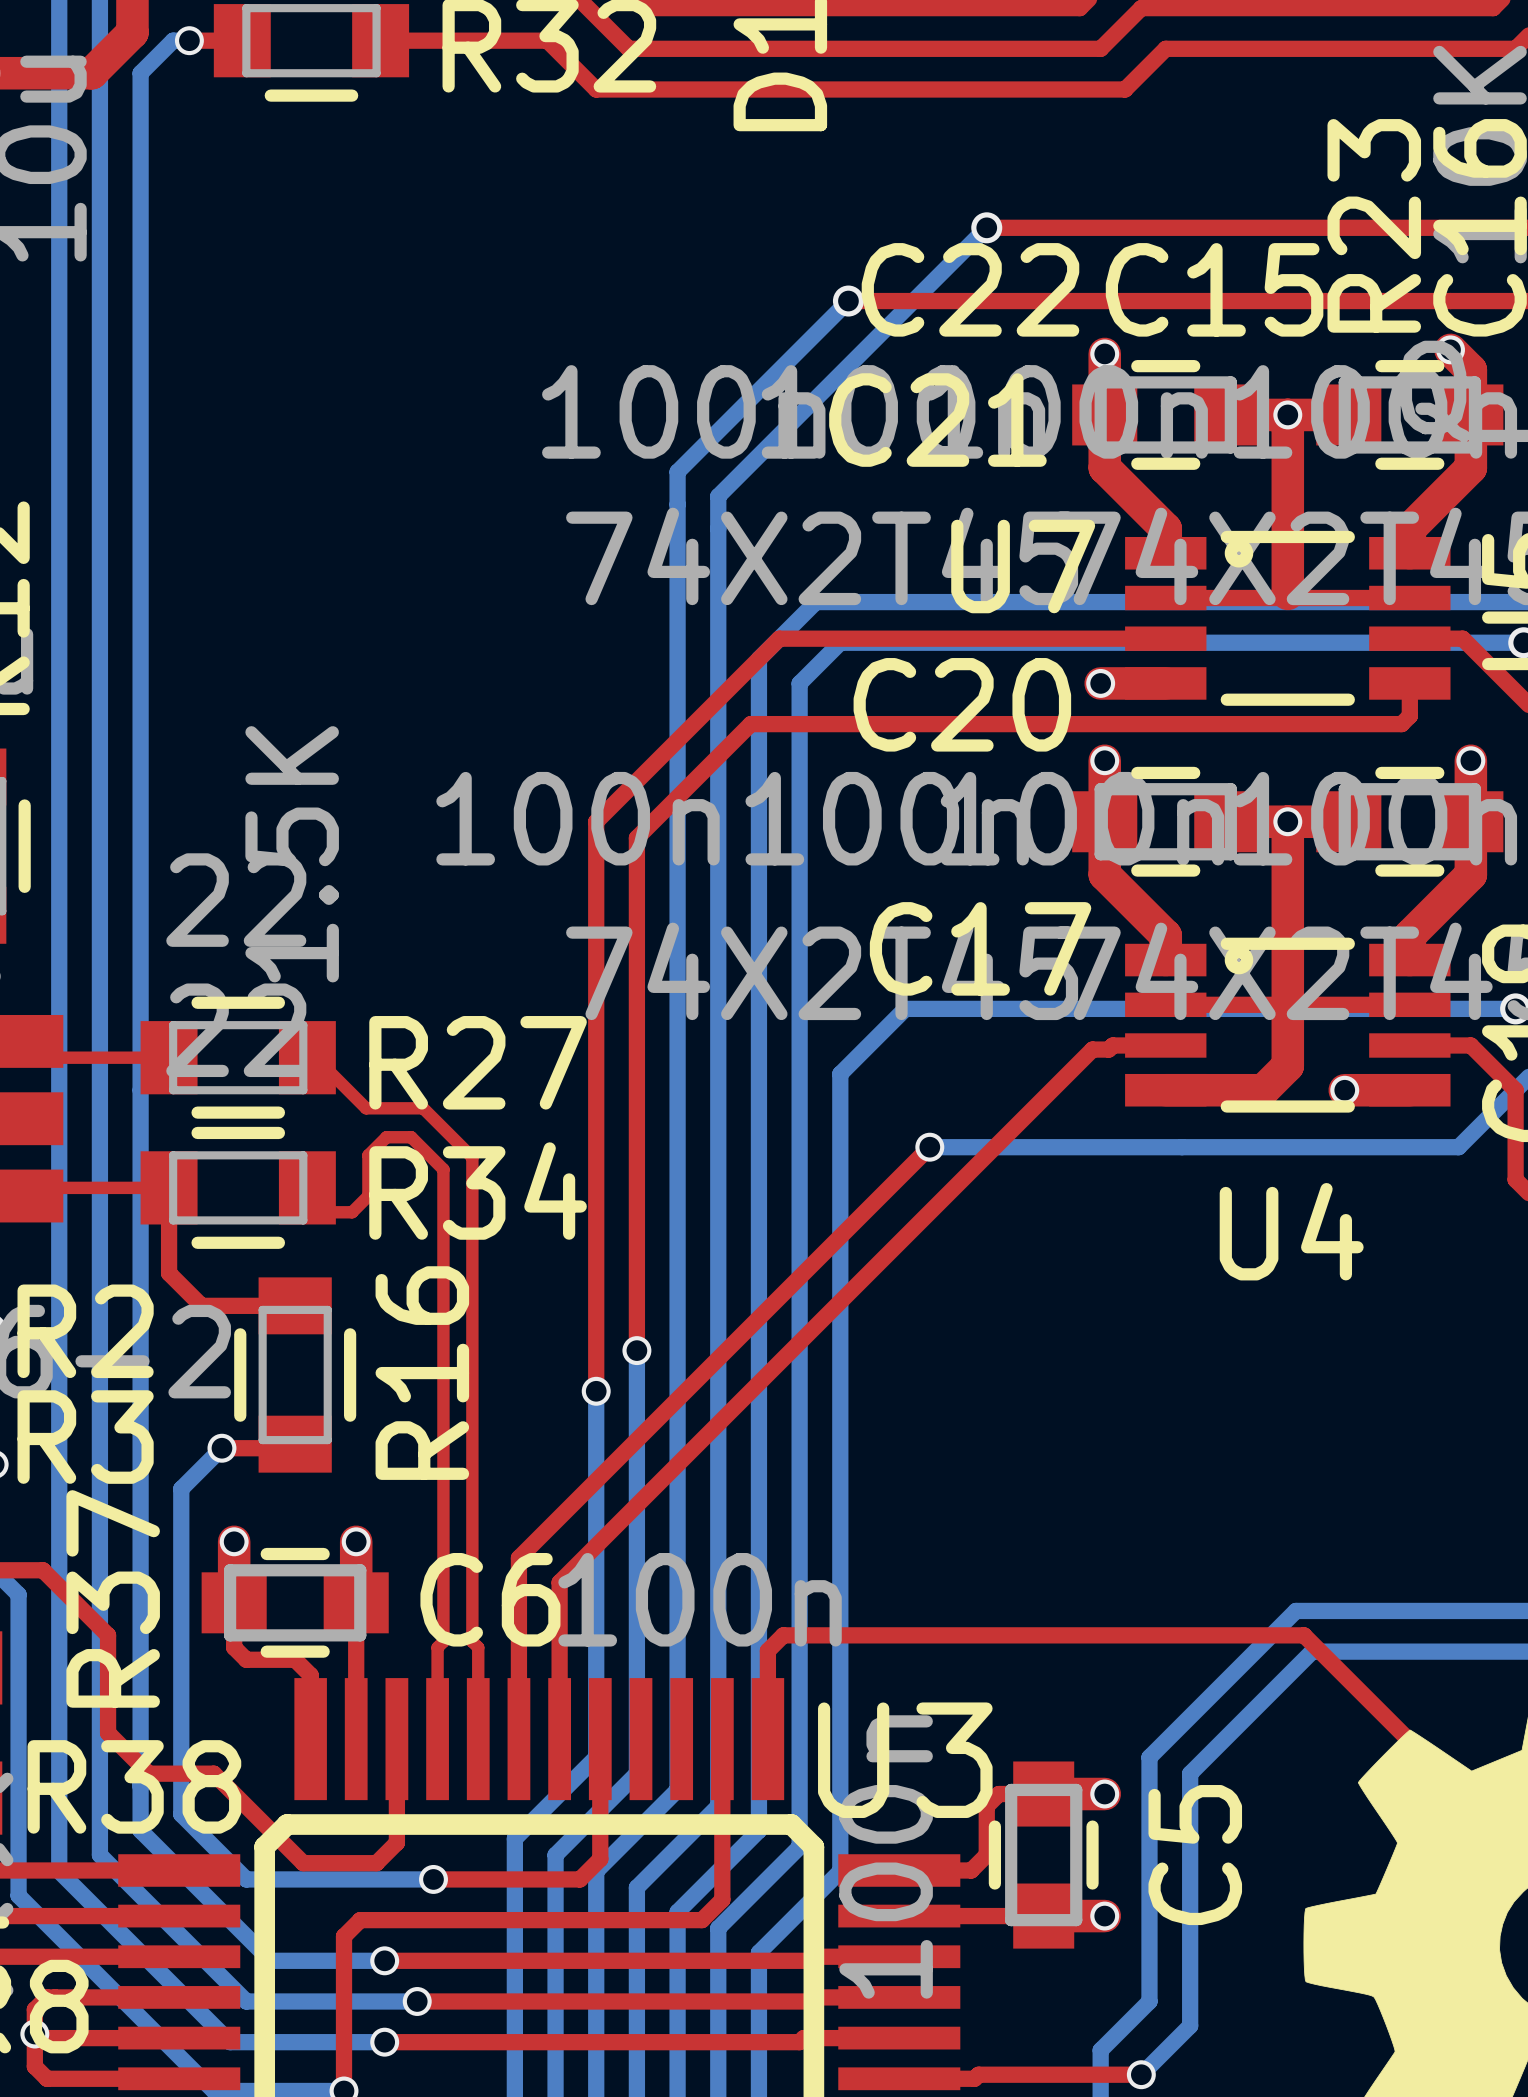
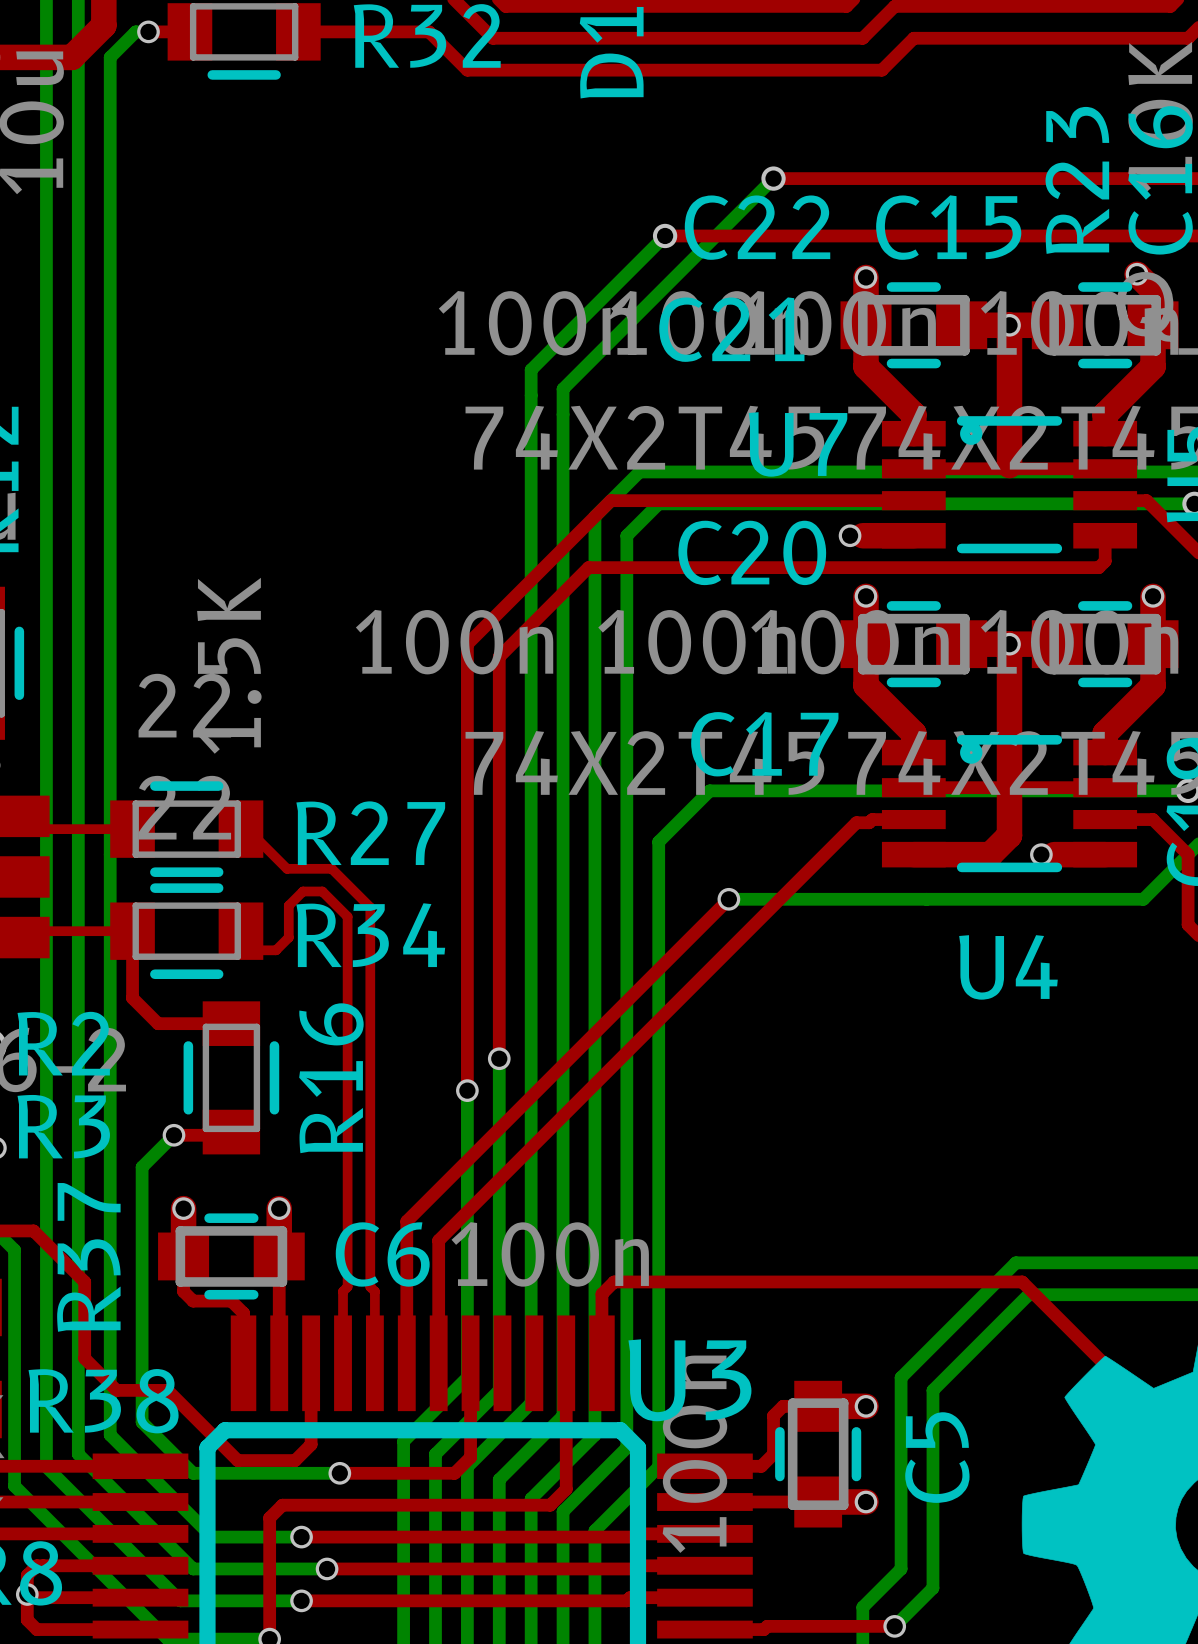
via position: (1100, 683) -> (850, 535)
via position: (1344, 1090) -> (1041, 854)

